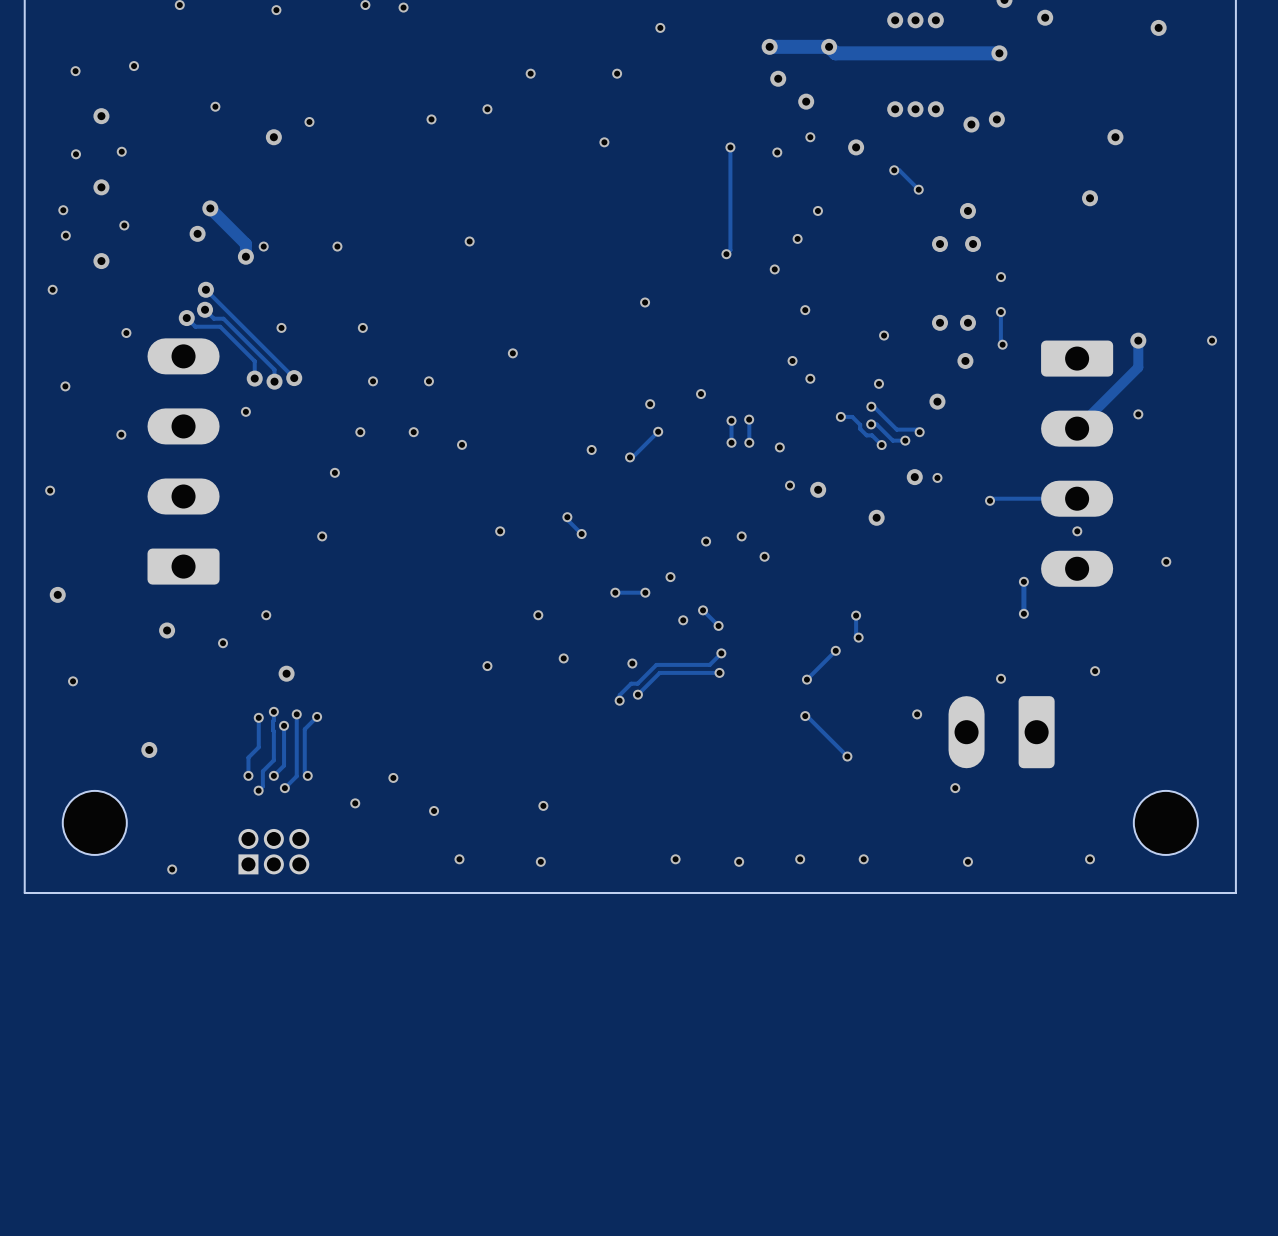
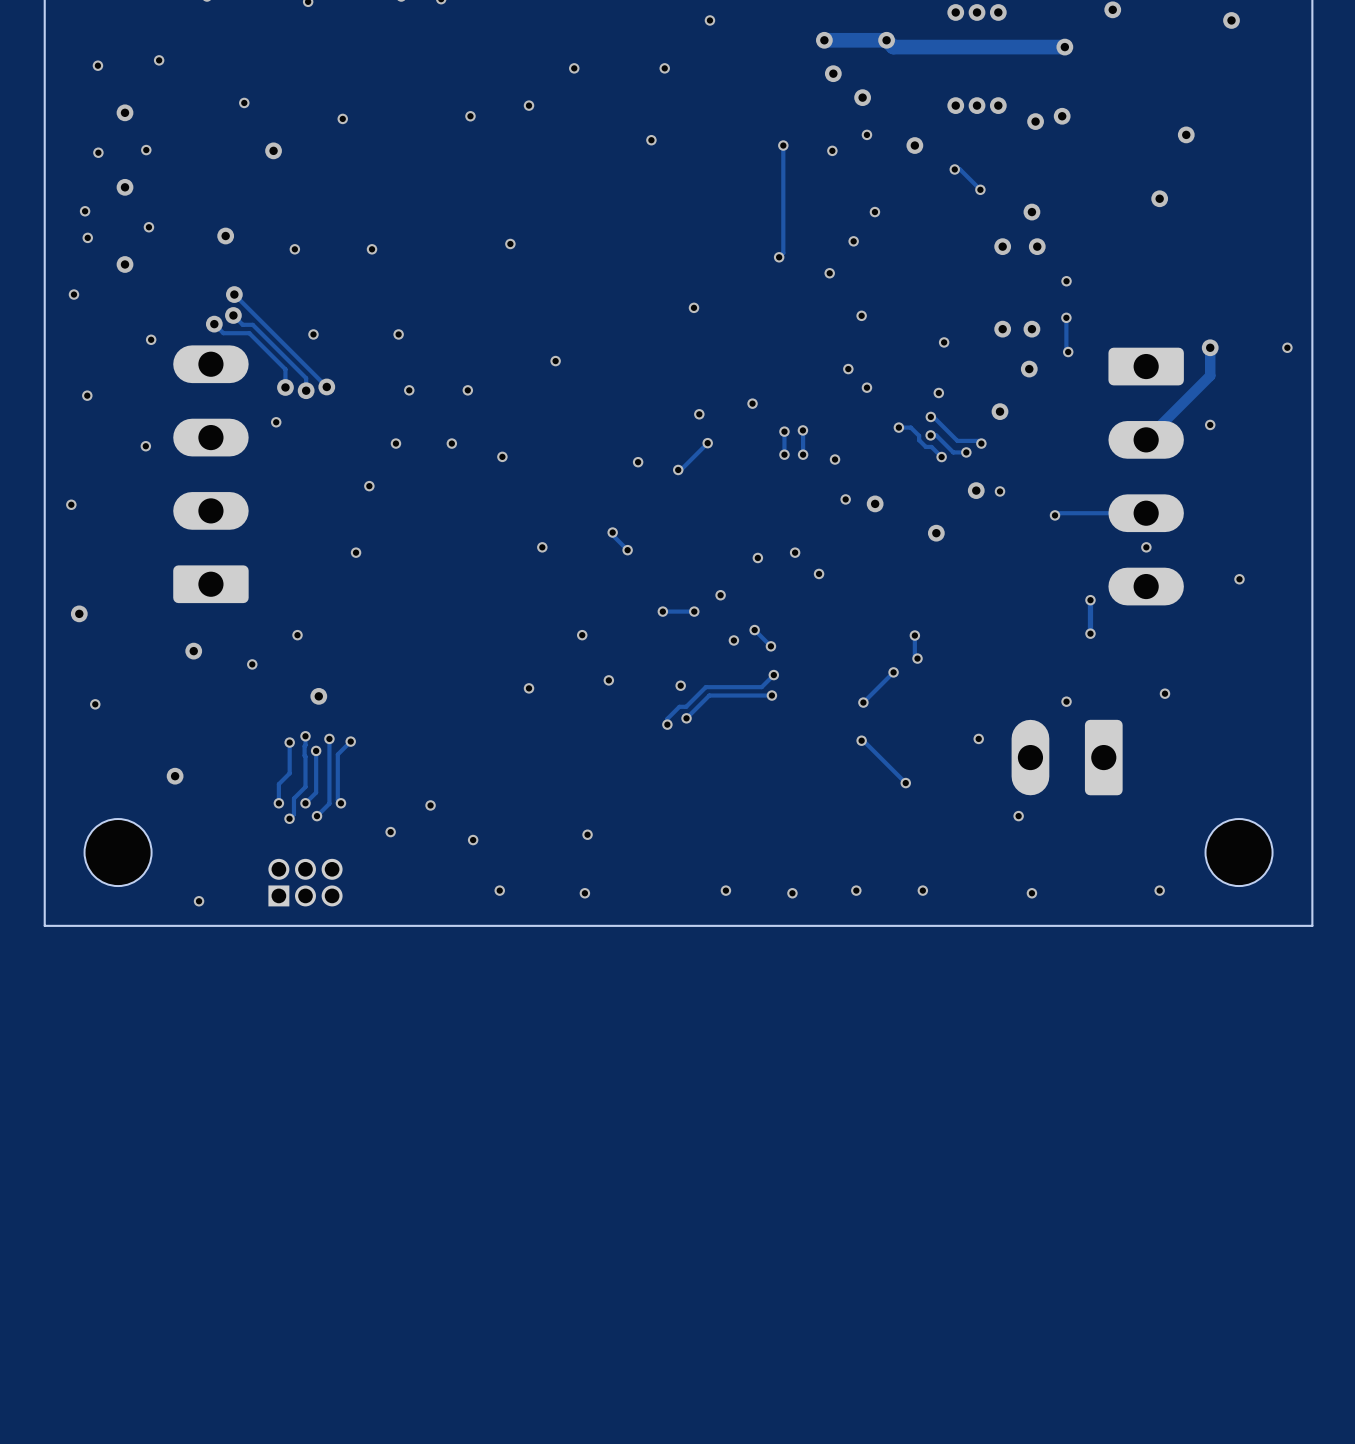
via: (273, 137) -> none
via: none -> (273, 150)
track: (210, 208) (245, 244) (245, 256) -> none
via: (210, 208) -> none
via: (245, 256) -> none

